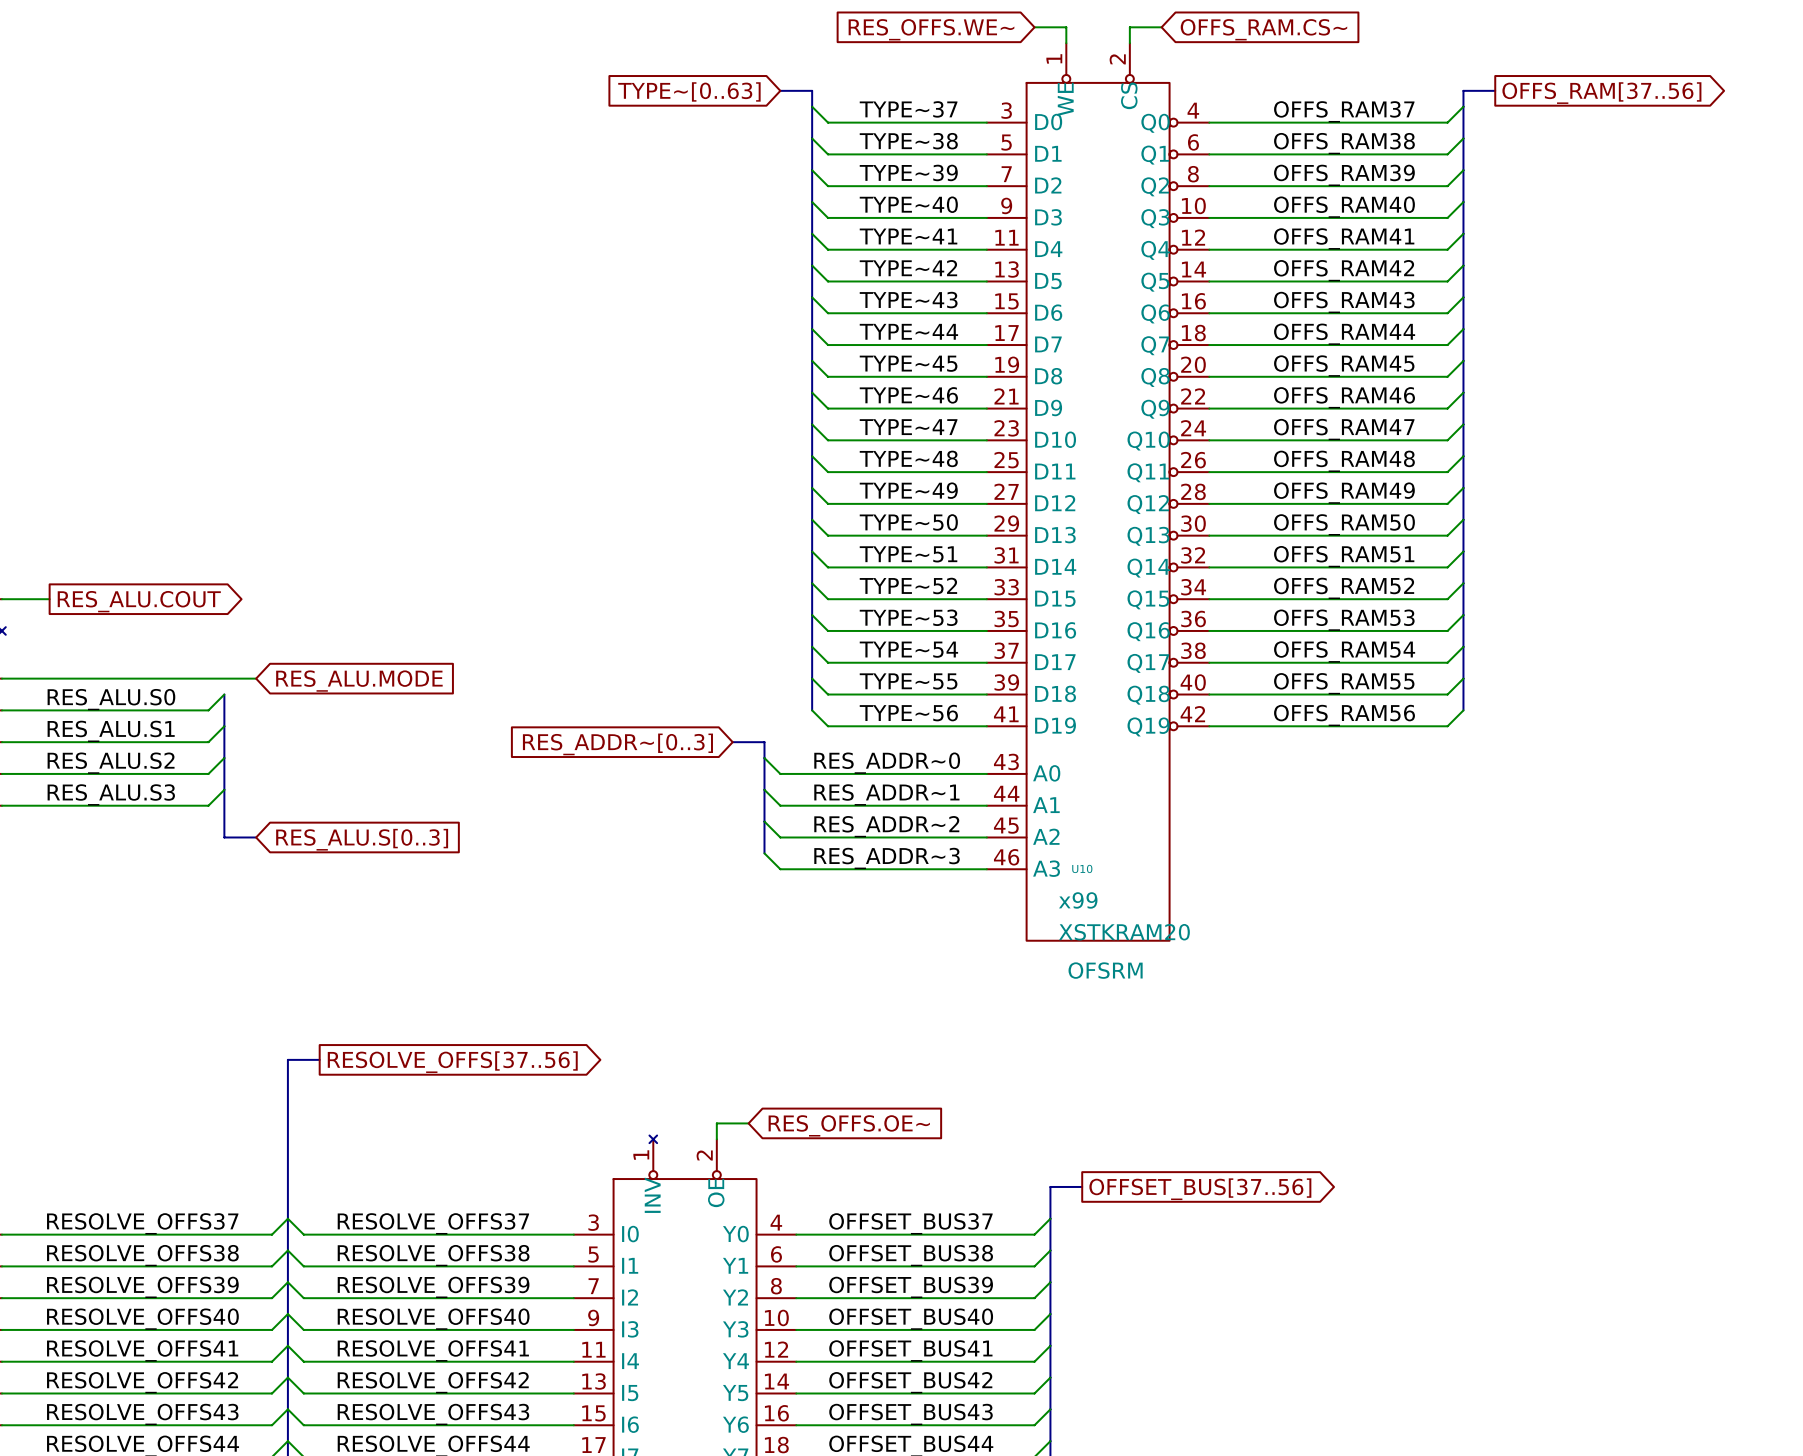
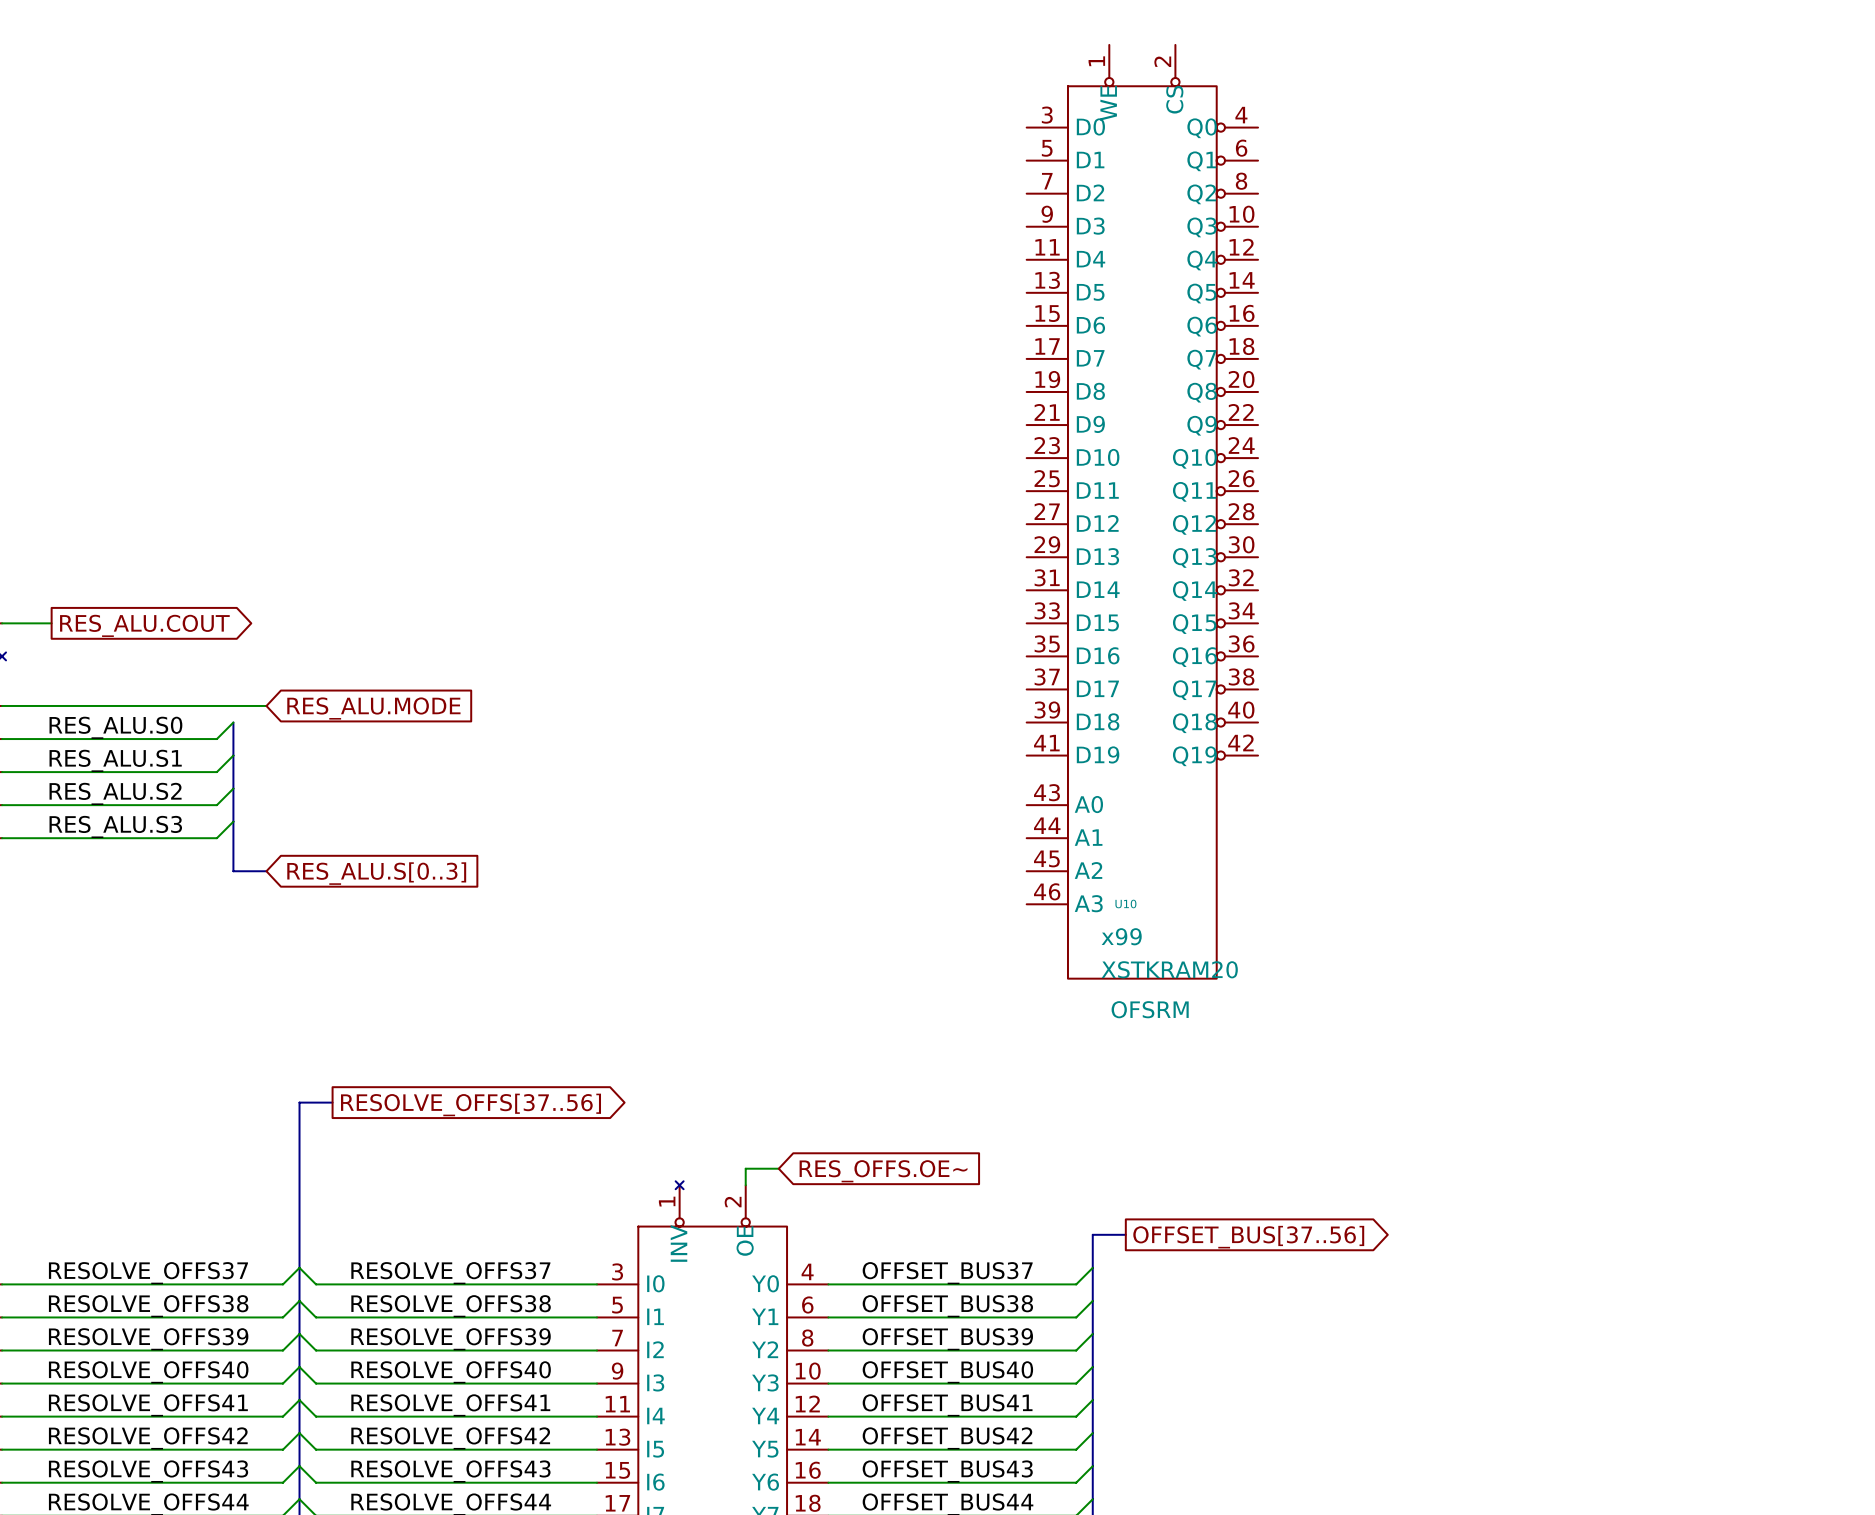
wire: (1034, 27) (1066, 27) (1066, 43) -> none
wire: (1161, 27) (1129, 27) (1129, 43) -> none
global label: RES_OFFS.WE~ (931, 29) -> none
global label: OFFS_RAM.CS~ (1263, 29) -> none
bus: (780, 90) (812, 90) (812, 710) -> none
bus: (1495, 90) (1463, 90) (1463, 710) -> none
global label: TYPE~[0..63] (689, 91) -> none
global label: OFFS_RAM[37..56] (1601, 93) -> none
wire: (812, 106) (828, 122) (986, 122) -> none
wire: (1463, 106) (1447, 122) (1209, 122) -> none
label: TYPE~37 (908, 109) -> none
label: OFFS_RAM37 (1344, 111) -> none
wire: (812, 138) (828, 154) (986, 154) -> none
wire: (1463, 138) (1447, 154) (1209, 154) -> none
label: TYPE~38 (908, 141) -> none
label: OFFS_RAM38 (1344, 143) -> none
wire: (812, 170) (828, 186) (986, 186) -> none
wire: (1463, 170) (1447, 186) (1209, 186) -> none
label: TYPE~39 (908, 172) -> none
label: OFFS_RAM39 (1344, 175) -> none
wire: (812, 202) (828, 217) (986, 217) -> none
wire: (1463, 202) (1447, 217) (1209, 217) -> none
label: TYPE~40 (908, 204) -> none
label: OFFS_RAM40 (1344, 207) -> none
wire: (812, 233) (828, 249) (986, 249) -> none
wire: (1463, 233) (1447, 249) (1209, 249) -> none
label: TYPE~41 (908, 236) -> none
label: OFFS_RAM41 (1344, 238) -> none
wire: (812, 265) (828, 281) (986, 281) -> none
wire: (1463, 265) (1447, 281) (1209, 281) -> none
label: TYPE~42 (908, 268) -> none
label: OFFS_RAM42 (1344, 270) -> none
wire: (812, 297) (828, 313) (986, 313) -> none
wire: (1463, 297) (1447, 313) (1209, 313) -> none
label: TYPE~43 (908, 300) -> none
label: OFFS_RAM43 (1344, 302) -> none
wire: (812, 329) (828, 345) (986, 345) -> none
wire: (1463, 329) (1447, 345) (1209, 345) -> none
label: TYPE~44 (908, 331) -> none
label: OFFS_RAM44 (1344, 334) -> none
wire: (812, 360) (828, 376) (986, 376) -> none
wire: (1463, 360) (1447, 376) (1209, 376) -> none
label: TYPE~45 (908, 363) -> none
label: OFFS_RAM45 (1344, 366) -> none
wire: (812, 392) (828, 408) (986, 408) -> none
wire: (1463, 392) (1447, 408) (1209, 408) -> none
label: TYPE~46 (908, 395) -> none
label: OFFS_RAM46 (1344, 397) -> none
wire: (812, 424) (828, 440) (986, 440) -> none
wire: (1463, 424) (1447, 440) (1209, 440) -> none
label: TYPE~47 (908, 427) -> none
label: OFFS_RAM47 (1344, 429) -> none
wire: (812, 456) (828, 472) (986, 472) -> none
wire: (1463, 456) (1447, 472) (1209, 472) -> none
label: TYPE~48 (908, 458) -> none
label: OFFS_RAM48 (1344, 461) -> none
wire: (812, 488) (828, 503) (986, 503) -> none
wire: (1463, 488) (1447, 503) (1209, 503) -> none
label: TYPE~49 (908, 490) -> none
label: OFFS_RAM49 (1344, 493) -> none
wire: (812, 519) (828, 535) (986, 535) -> none
wire: (1463, 519) (1447, 535) (1209, 535) -> none
label: TYPE~50 (908, 522) -> none
label: OFFS_RAM50 (1344, 524) -> none
wire: (812, 551) (828, 567) (986, 567) -> none
wire: (1463, 551) (1447, 567) (1209, 567) -> none
label: TYPE~51 (908, 554) -> none
label: OFFS_RAM51 (1344, 556) -> none
wire: (812, 583) (828, 599) (986, 599) -> none
wire: (1463, 583) (1447, 599) (1209, 599) -> none
label: TYPE~52 (908, 585) -> none
label: OFFS_RAM52 (1344, 588) -> none
wire: (812, 615) (828, 630) (986, 630) -> none
wire: (1463, 615) (1447, 630) (1209, 630) -> none
label: TYPE~53 (908, 617) -> none
label: OFFS_RAM53 (1344, 620) -> none
wire: (812, 646) (828, 662) (986, 662) -> none
wire: (1463, 646) (1447, 662) (1209, 662) -> none
label: TYPE~54 (908, 649) -> none
label: OFFS_RAM54 (1344, 651) -> none
wire: (812, 678) (828, 694) (986, 694) -> none
wire: (1463, 678) (1447, 694) (1209, 694) -> none
label: TYPE~55 (908, 681) -> none
label: OFFS_RAM55 (1344, 683) -> none
wire: (812, 710) (828, 726) (986, 726) -> none
wire: (1463, 710) (1447, 726) (1209, 726) -> none
label: TYPE~56 (908, 713) -> none
label: OFFS_RAM56 (1344, 715) -> none
bus: (732, 742) (764, 742) (764, 853) -> none
global label: RES_ADDR~[0..3] (617, 744) -> none
wire: (764, 758) (780, 773) (986, 773) -> none
label: RES_ADDR~0 (887, 763) -> none
wire: (764, 789) (780, 805) (986, 805) -> none
label: RES_ADDR~1 (886, 794) -> none
wire: (764, 821) (780, 837) (986, 837) -> none
label: RES_ADDR~2 (886, 826) -> none
wire: (764, 853) (780, 869) (986, 869) -> none
label: RES_ADDR~3 (887, 858) -> none

